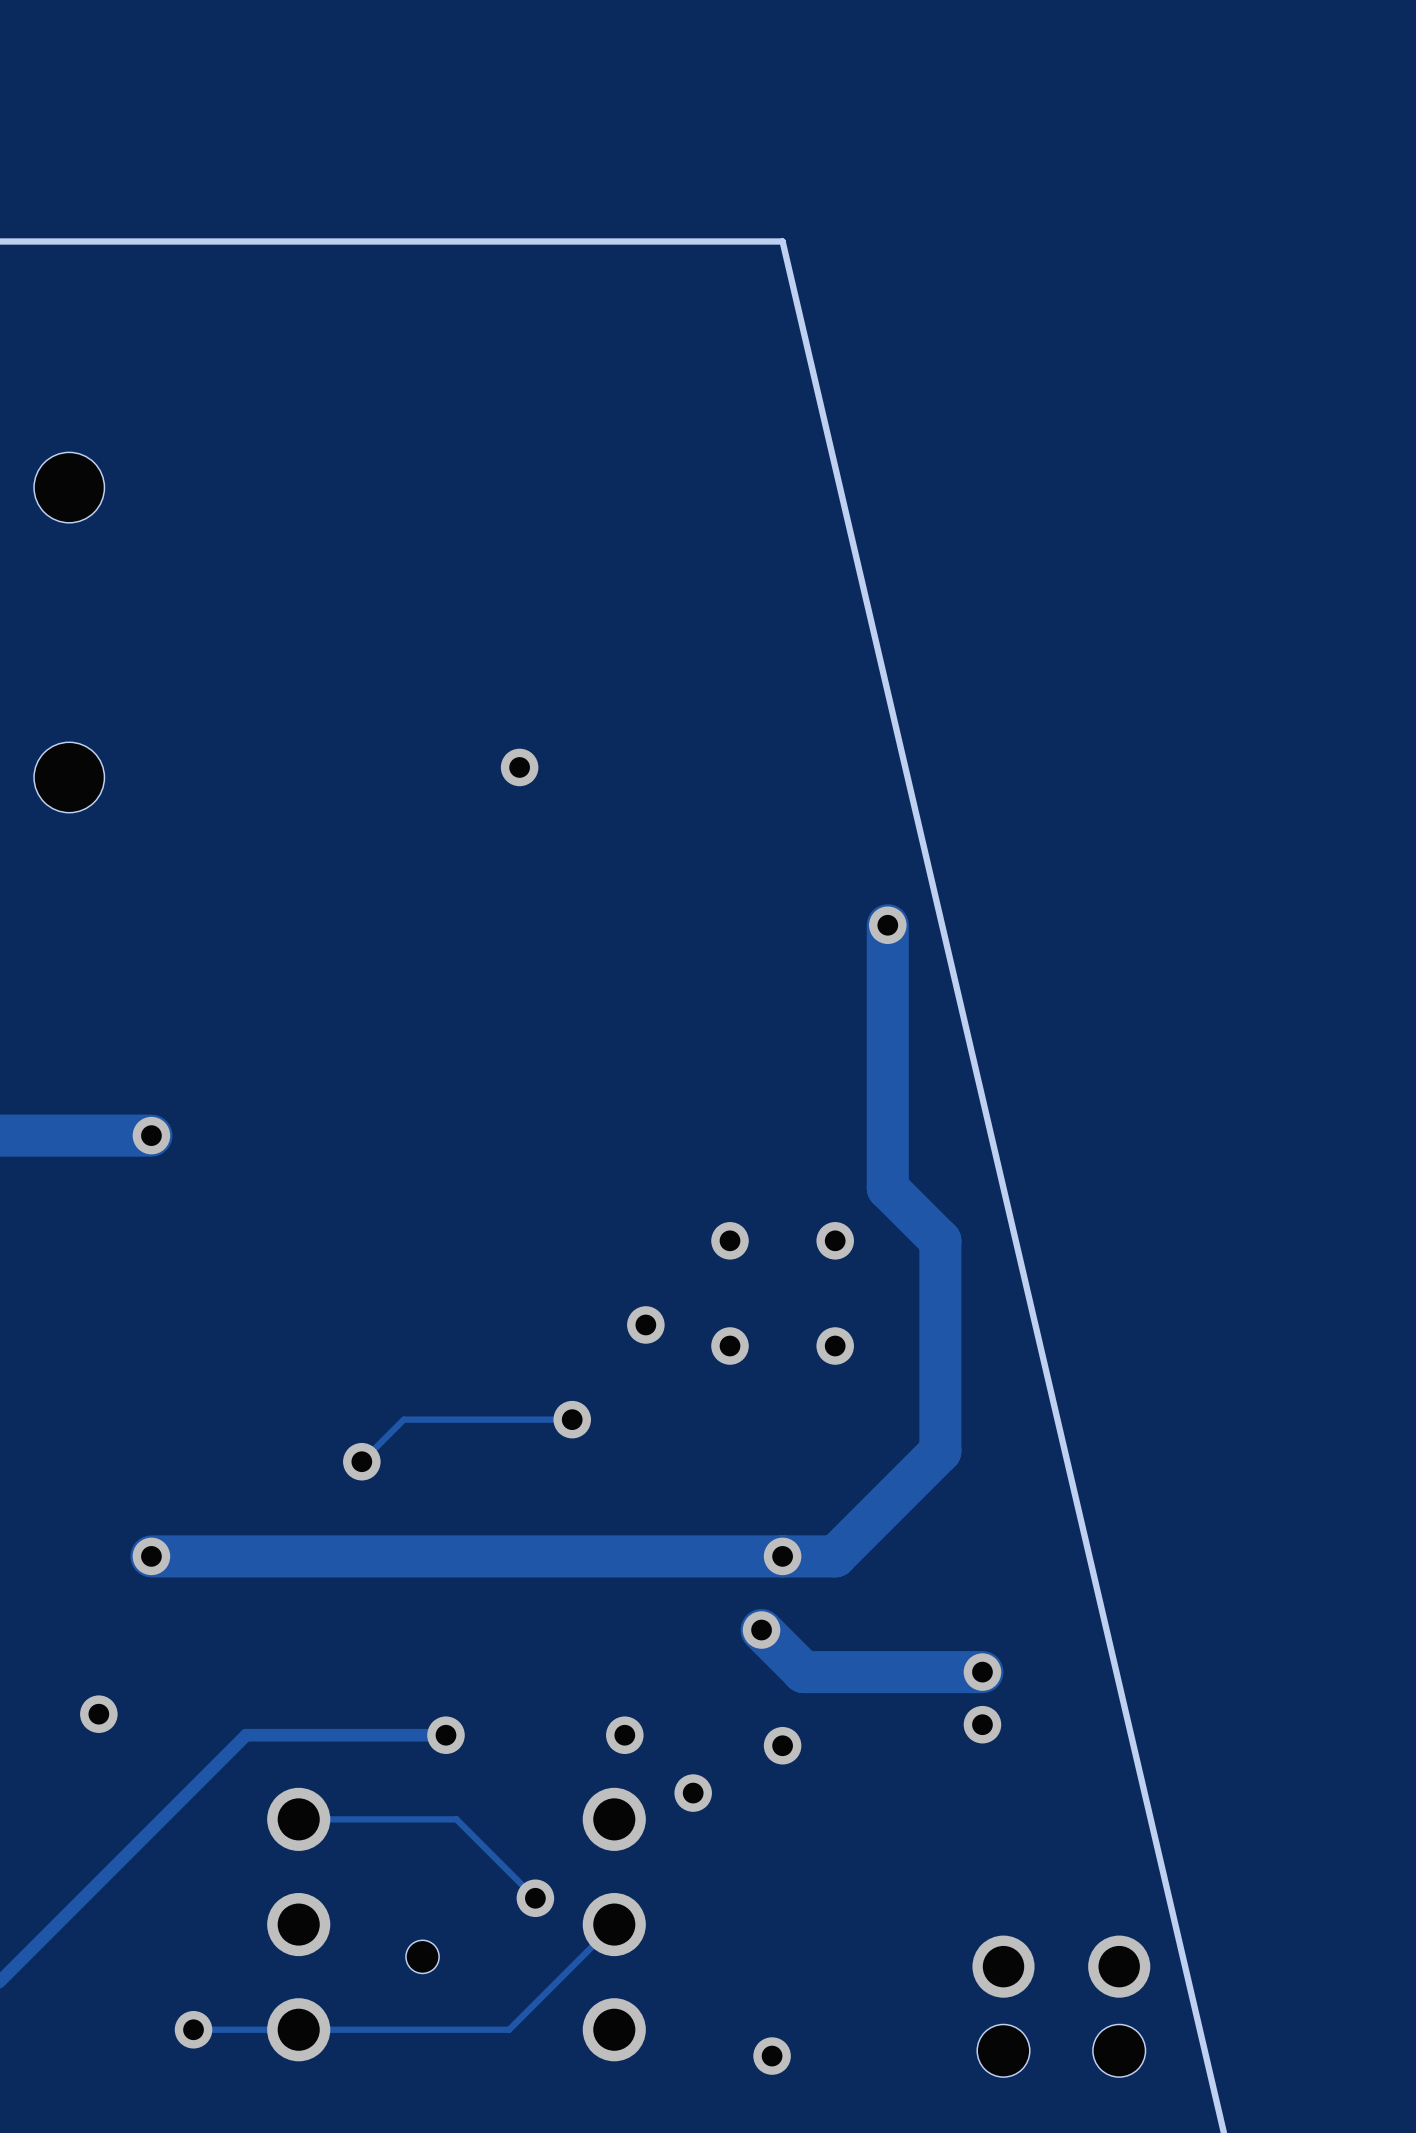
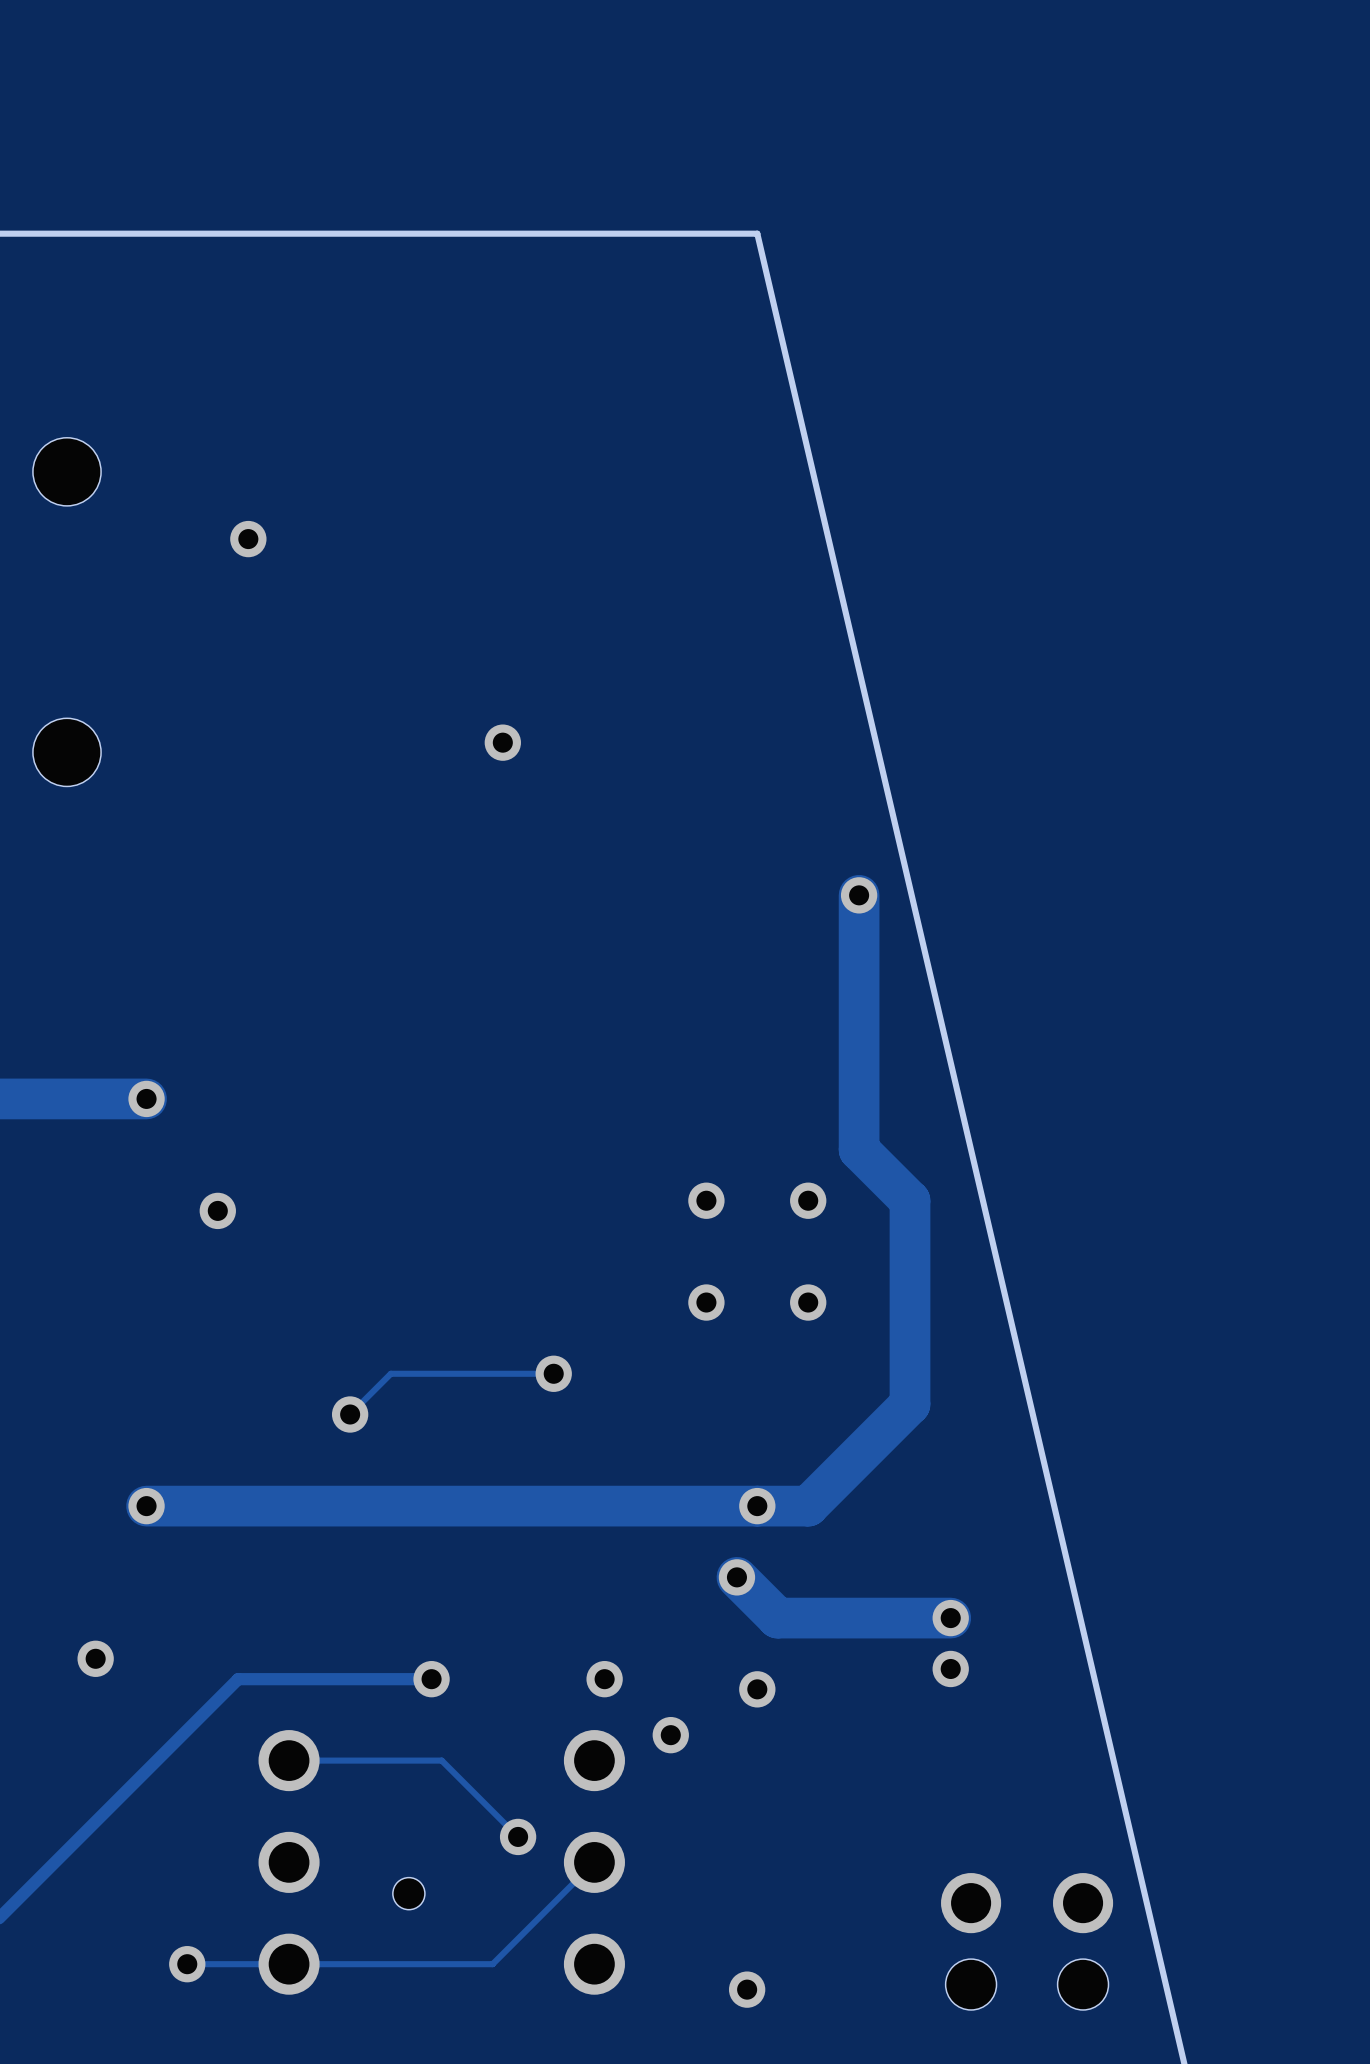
via: none -> (248, 539)
via: none -> (217, 1210)
via: (645, 1324) -> none

